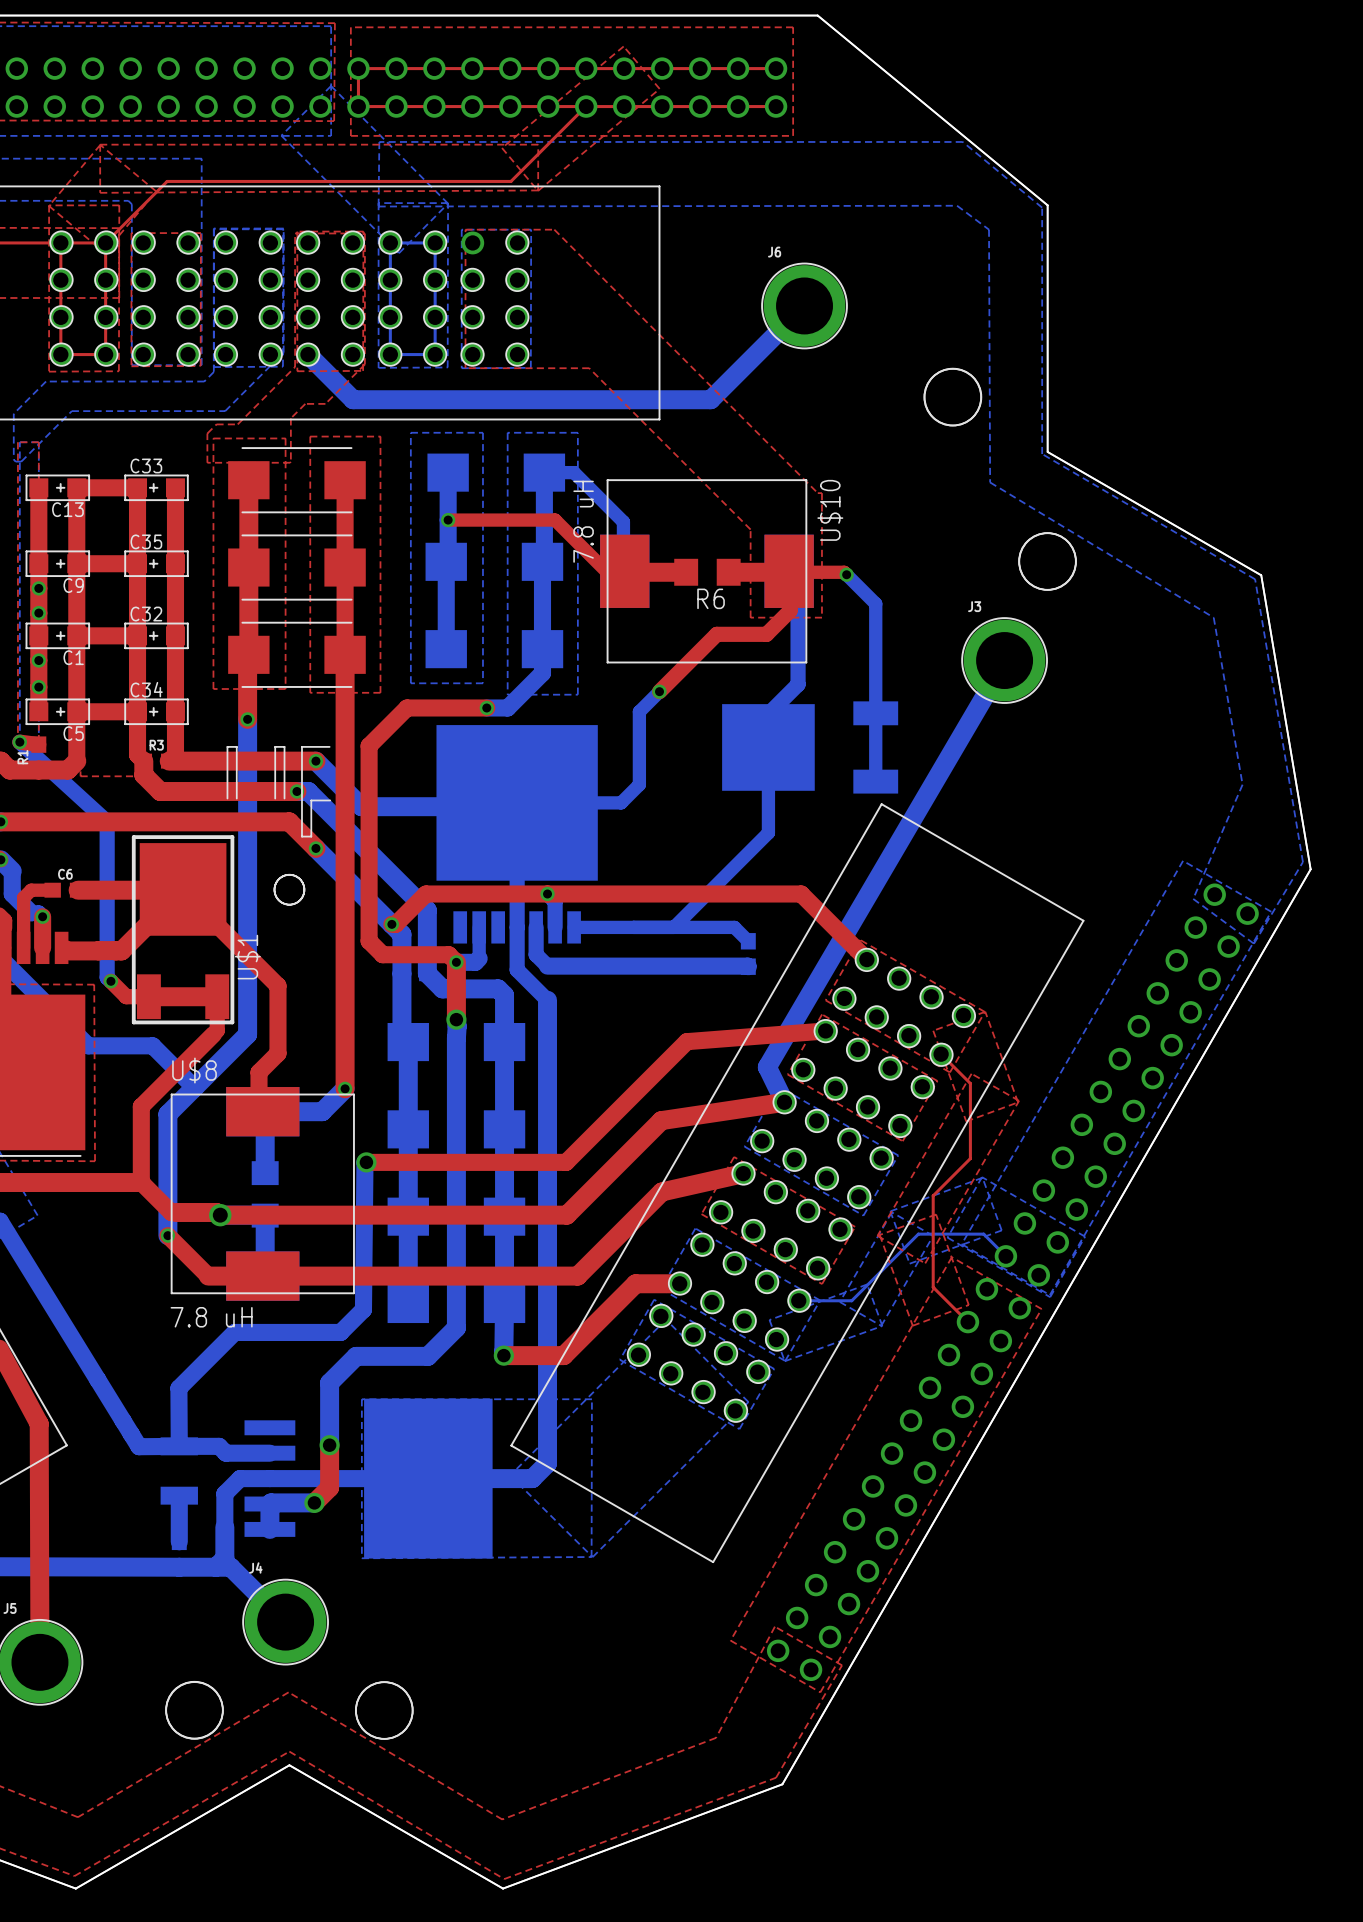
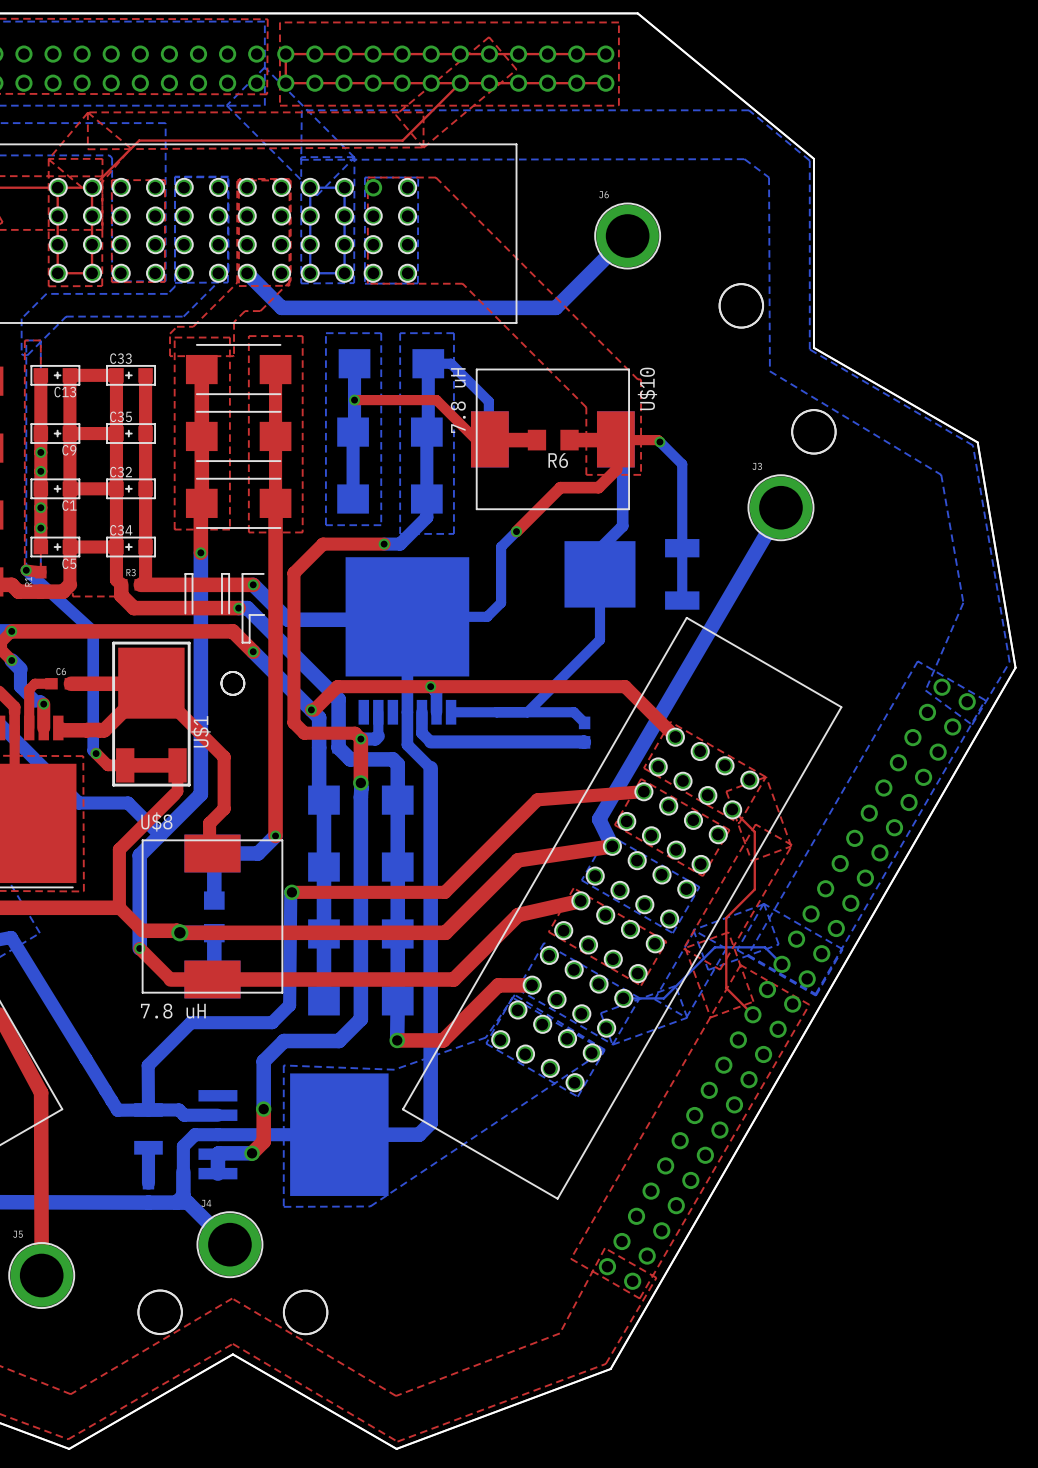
bottom zone outline: none -> (514, 994) (605, 1049) (370, 1206) (283, 1206) (283, 1065) (394, 1069) (485, 1037) (514, 994)
bottom zone outline: (666, 1319) (510, 1475) (592, 1557) (748, 1402) (666, 1319) -> none
bottom zone outline: (361, 1399) (361, 1558) (591, 1557) (591, 1399) (361, 1399) -> none

